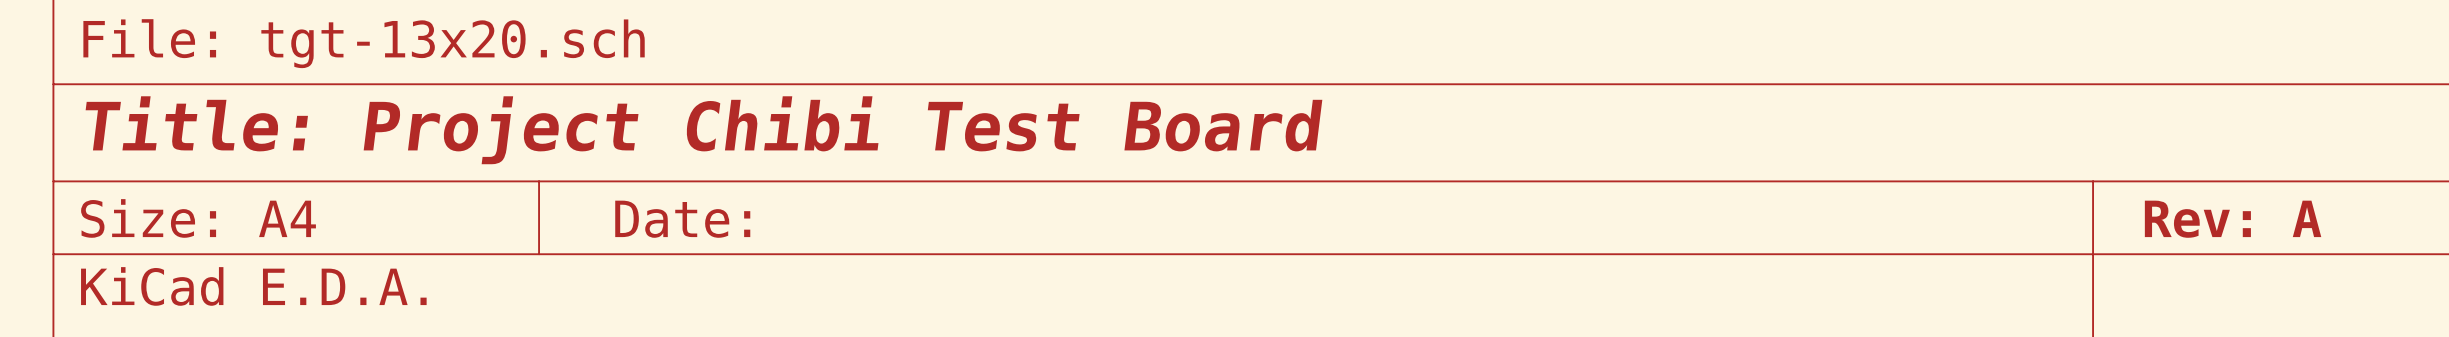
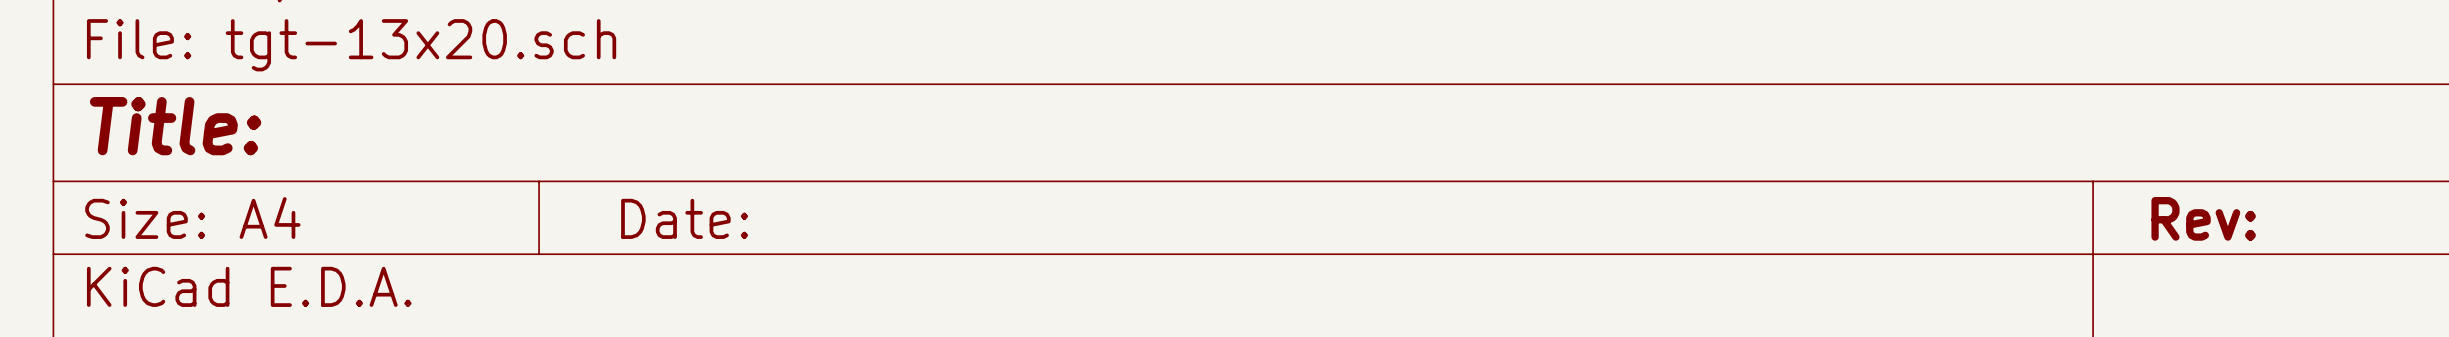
title block: Title: Project Chibi Test Board (703, 130) -> Title: (175, 126)
title block: Rev: A (2233, 219) -> Rev: (2203, 218)

